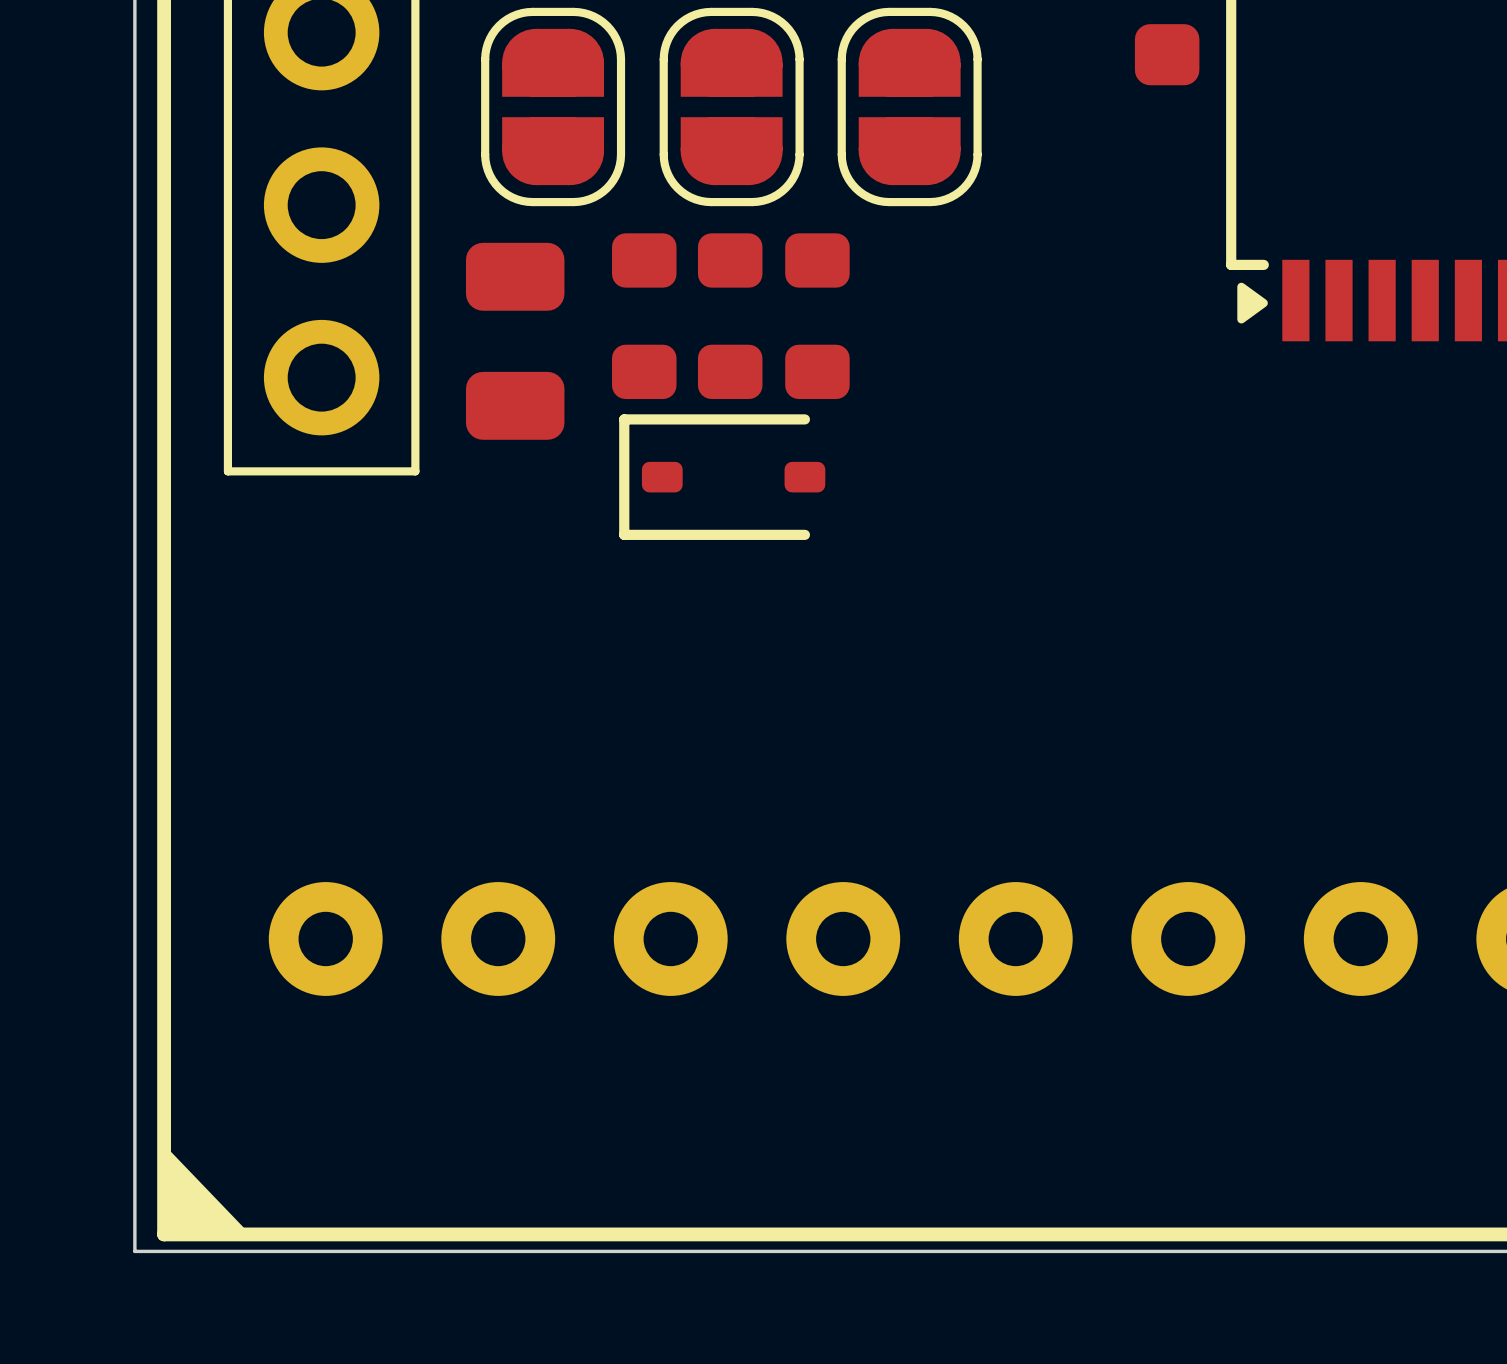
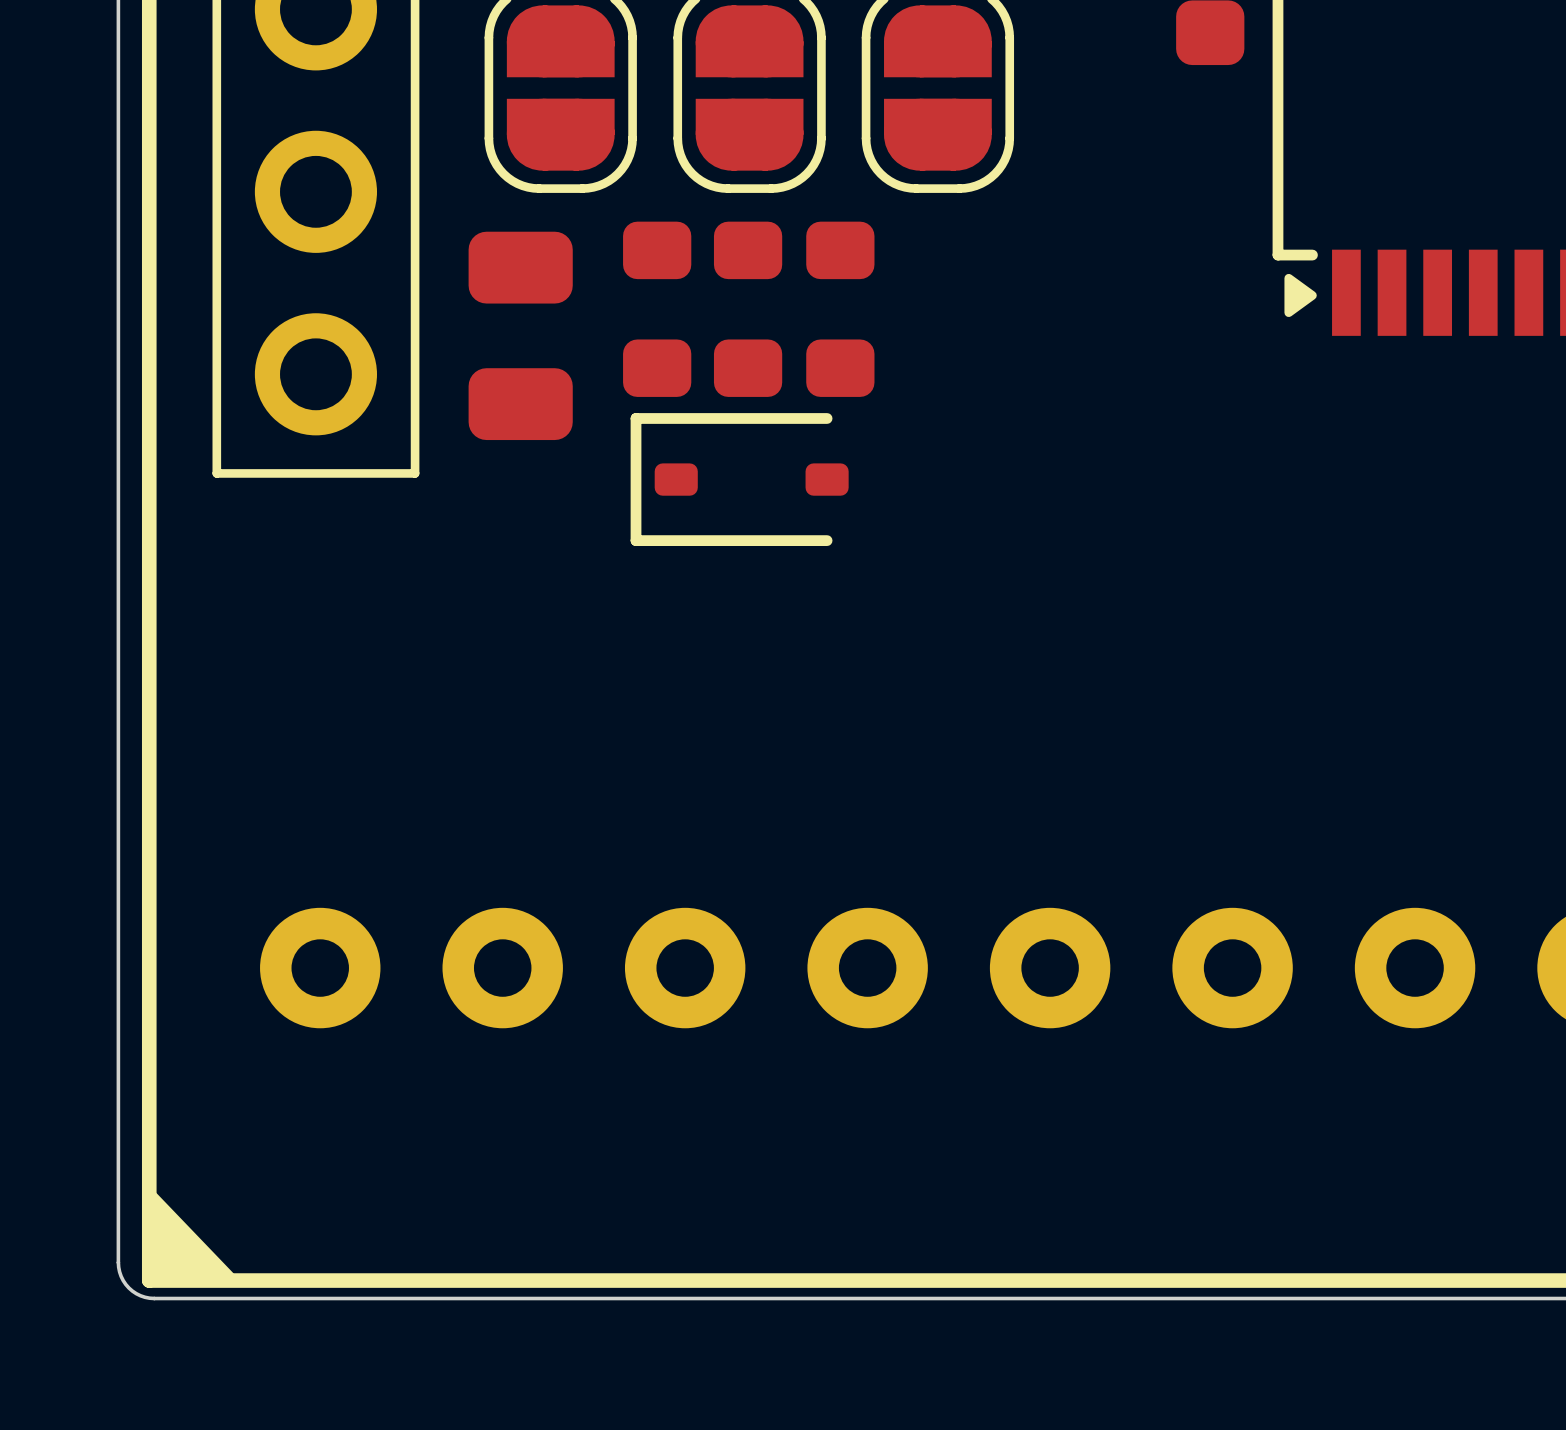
board edge: (134, 1217) (134, 1251) (168, 1251) -> (118, 1262) (121, 1276) (128, 1287) (140, 1295) (154, 1298)

